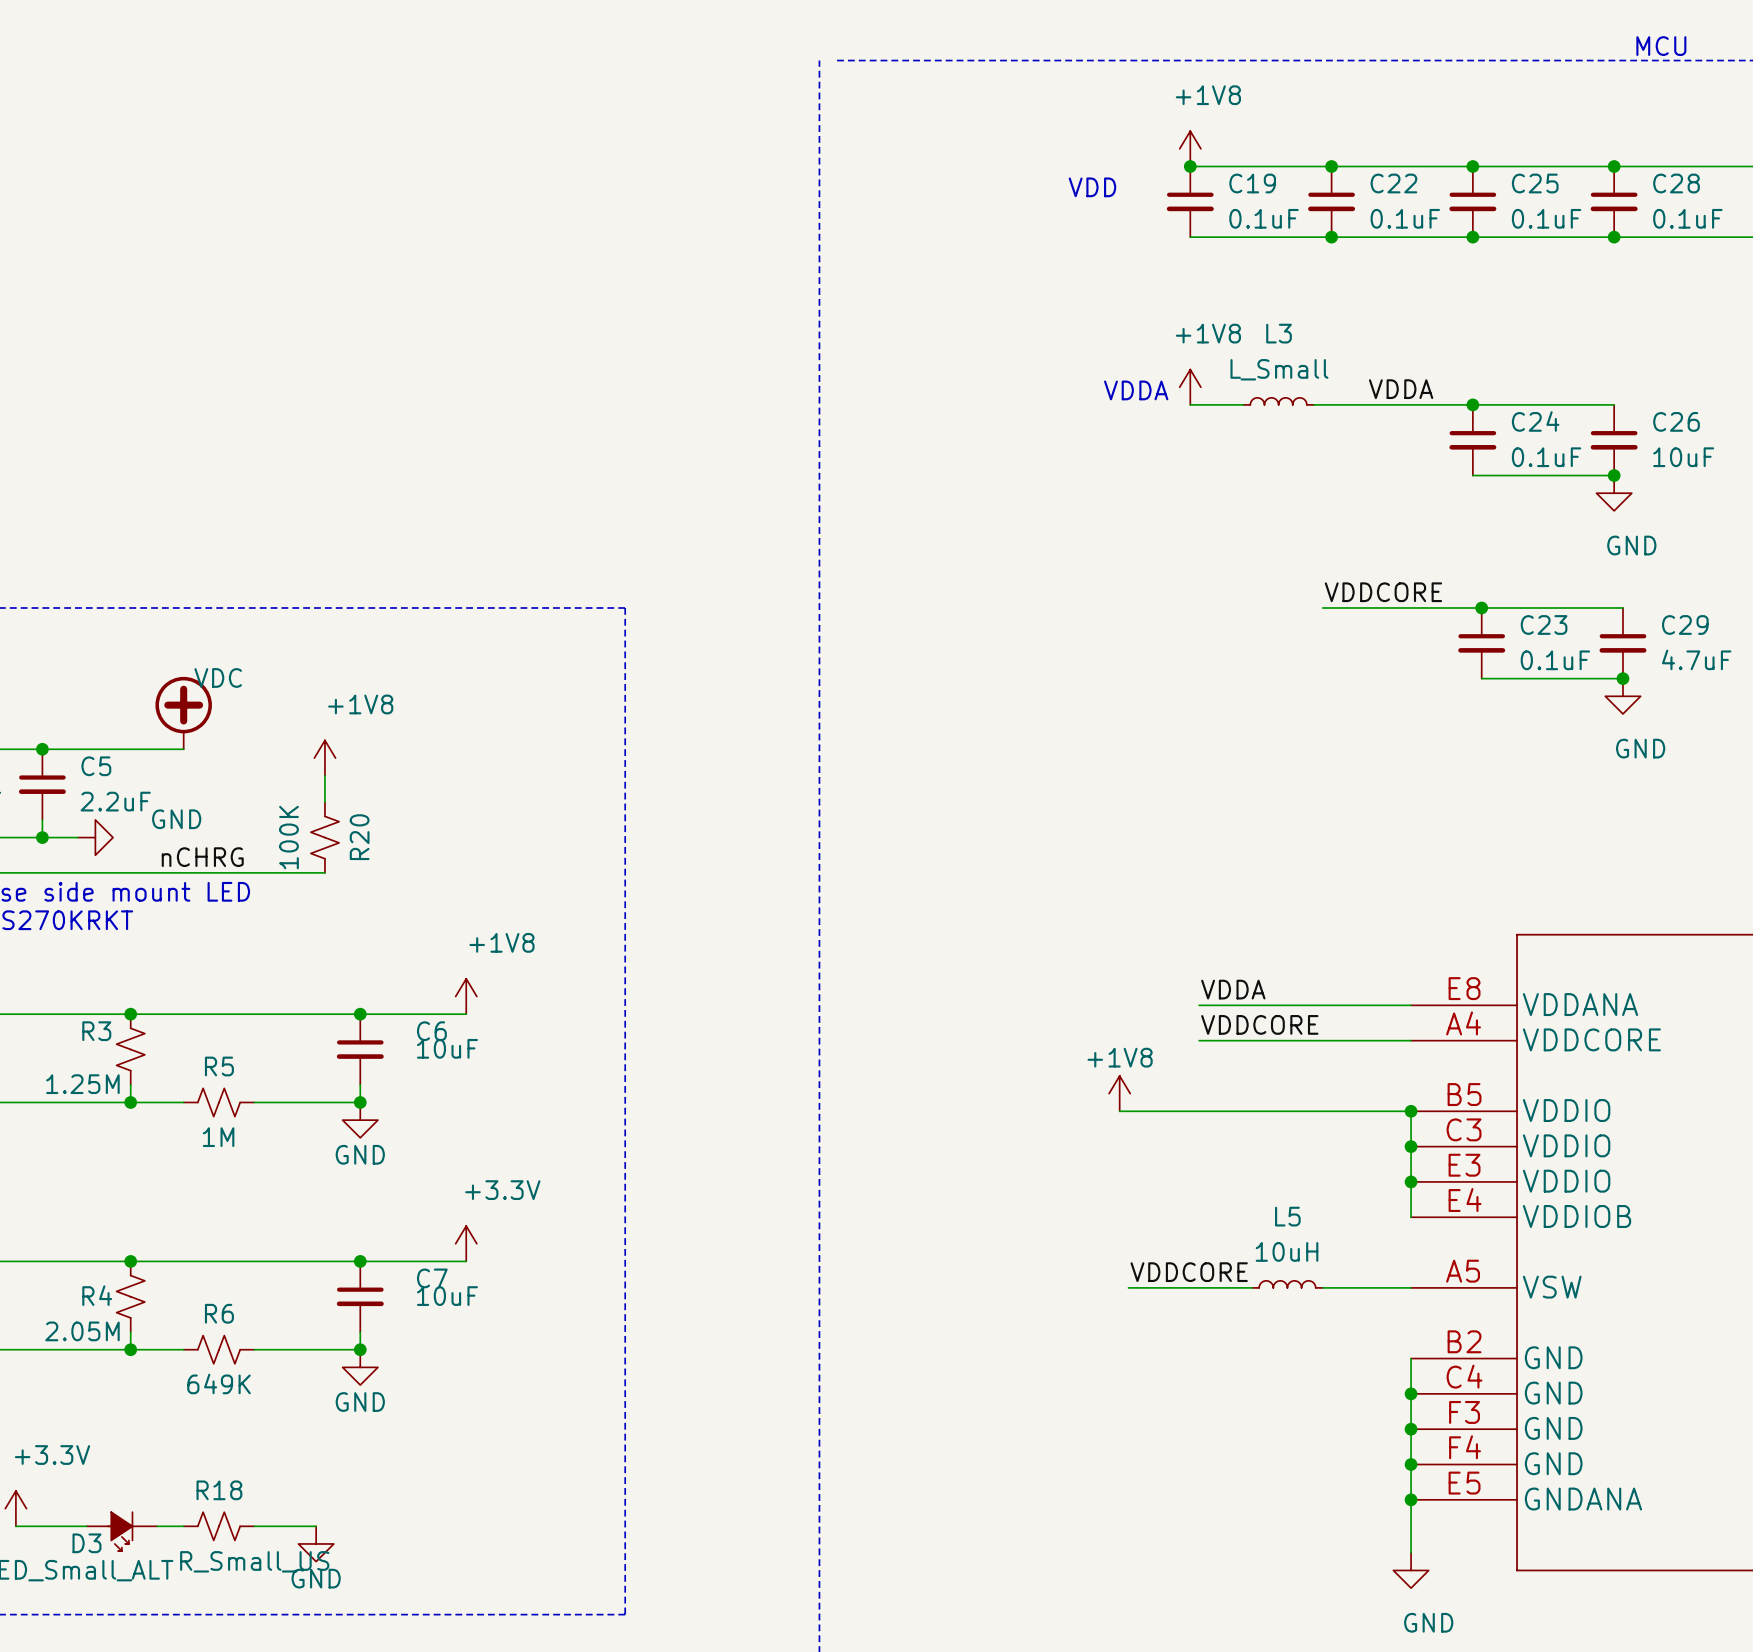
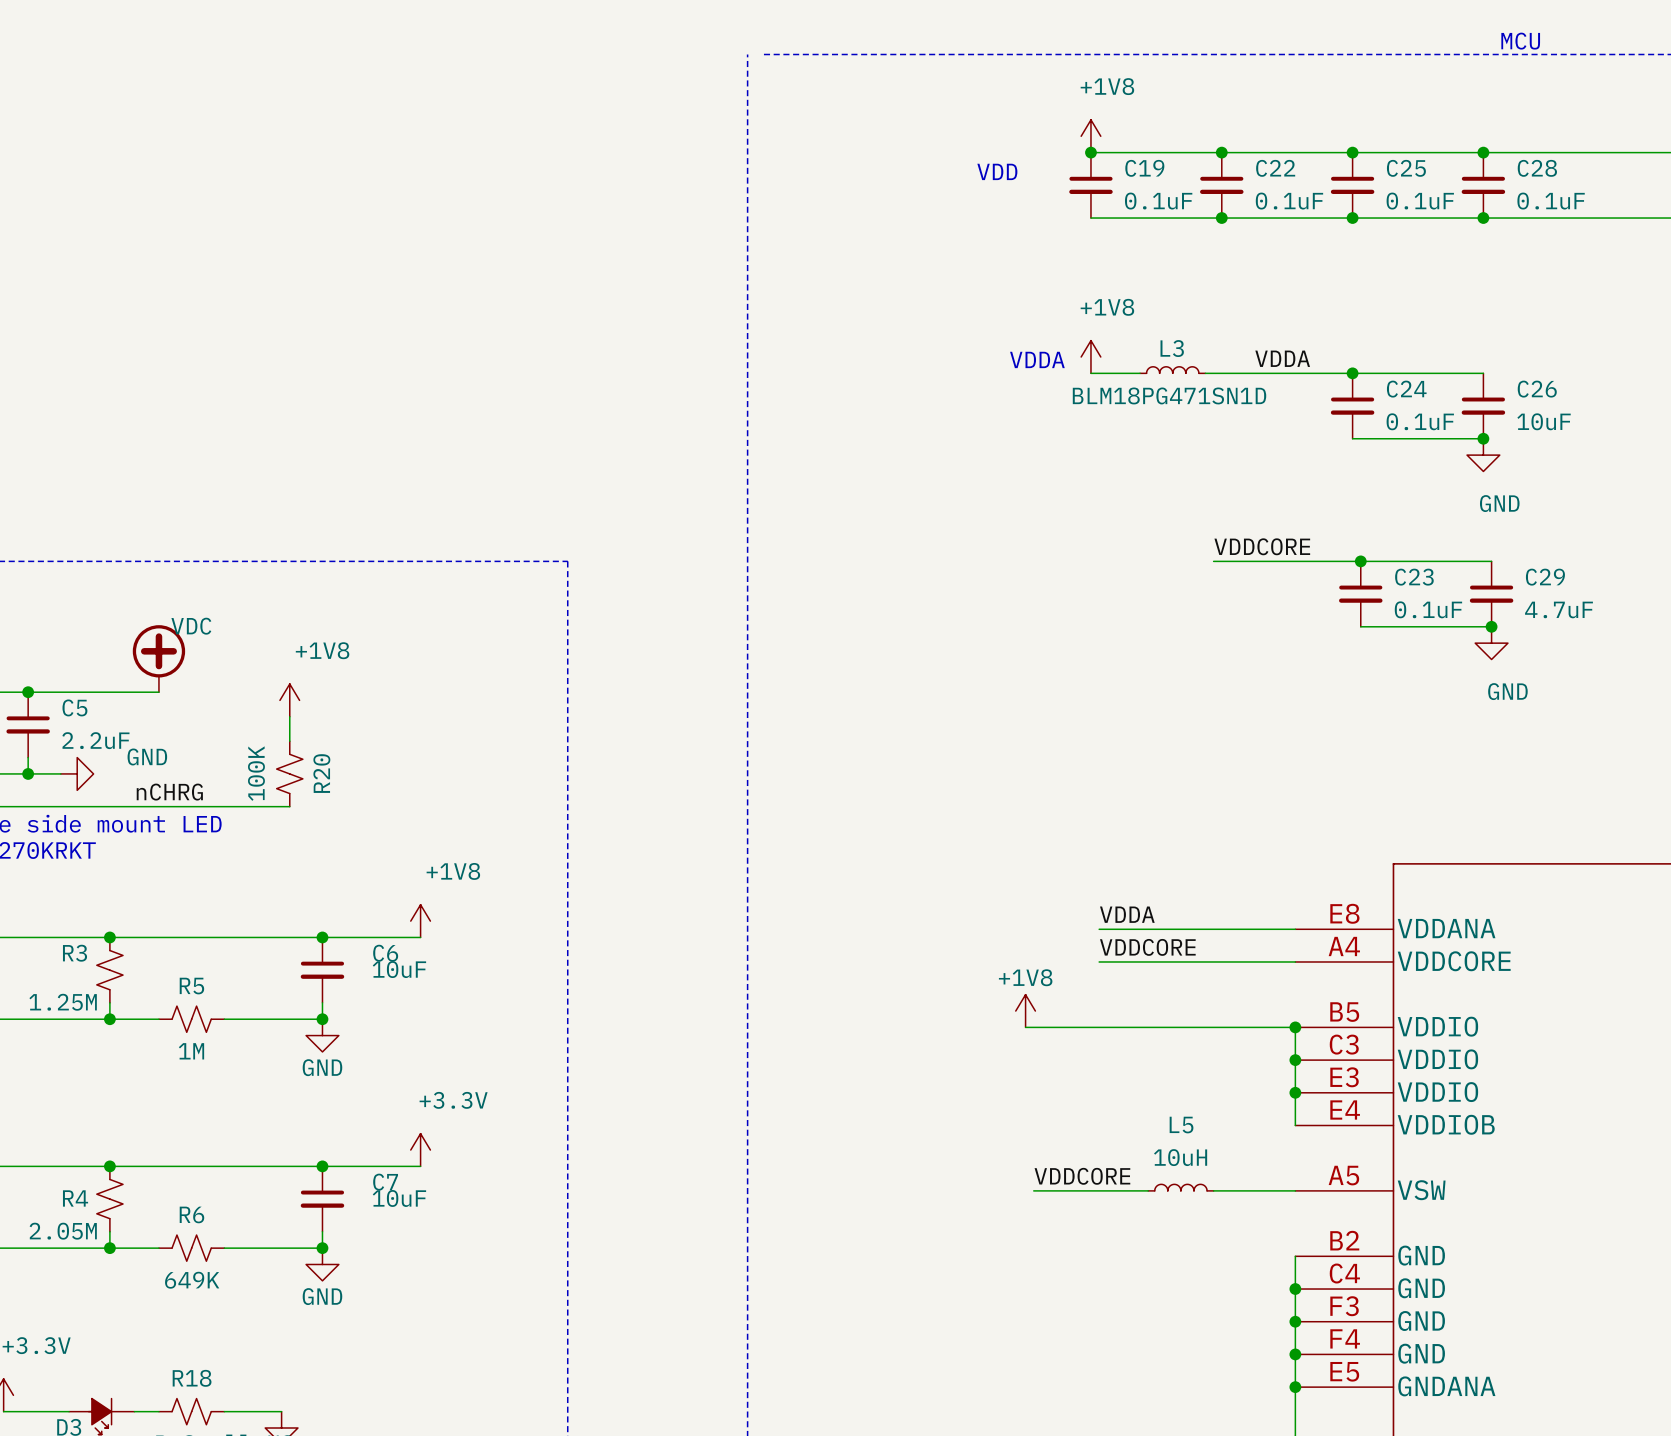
L3 name position: L3 (1279, 333) -> L3 (1172, 348)
L3 value: L_Small (1279, 369) -> BLM18PG471SN1D (1169, 395)

